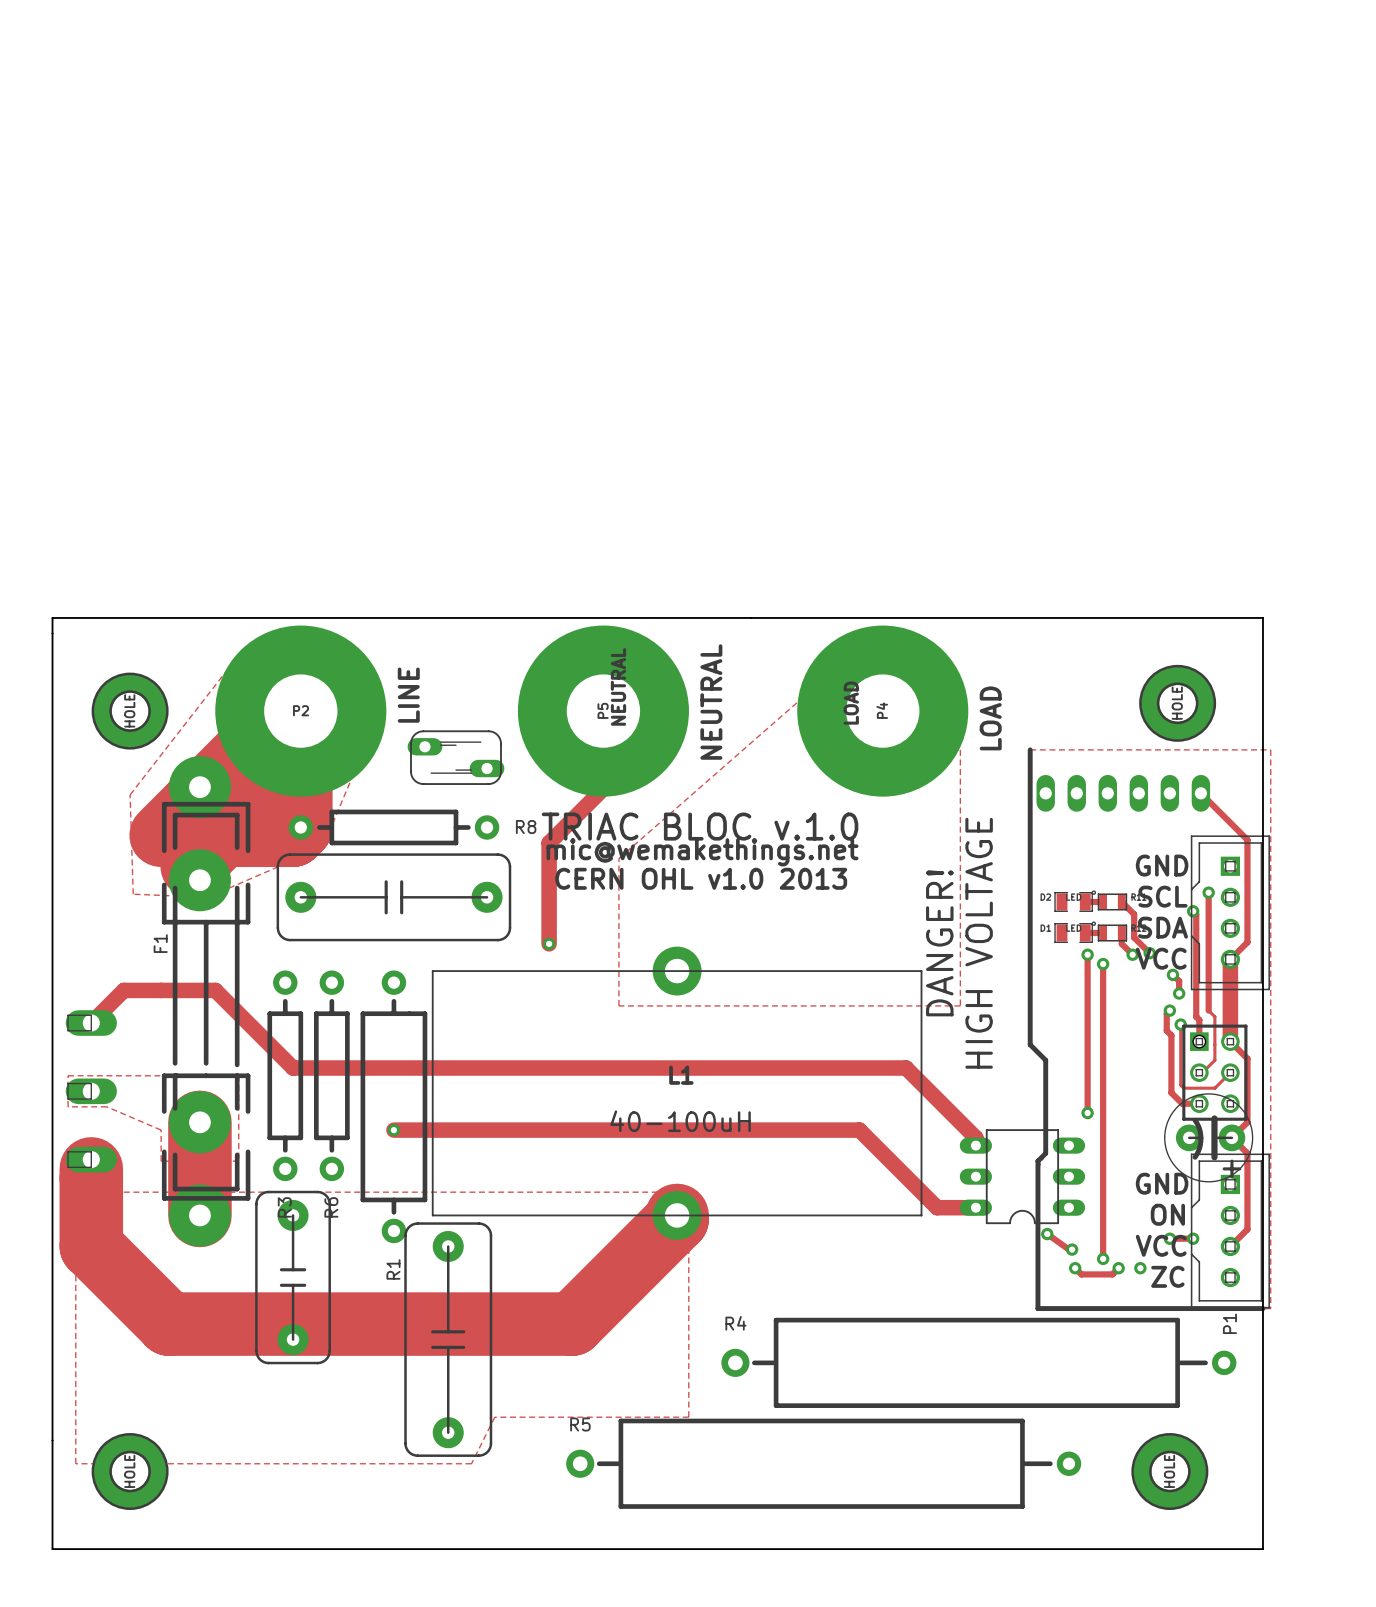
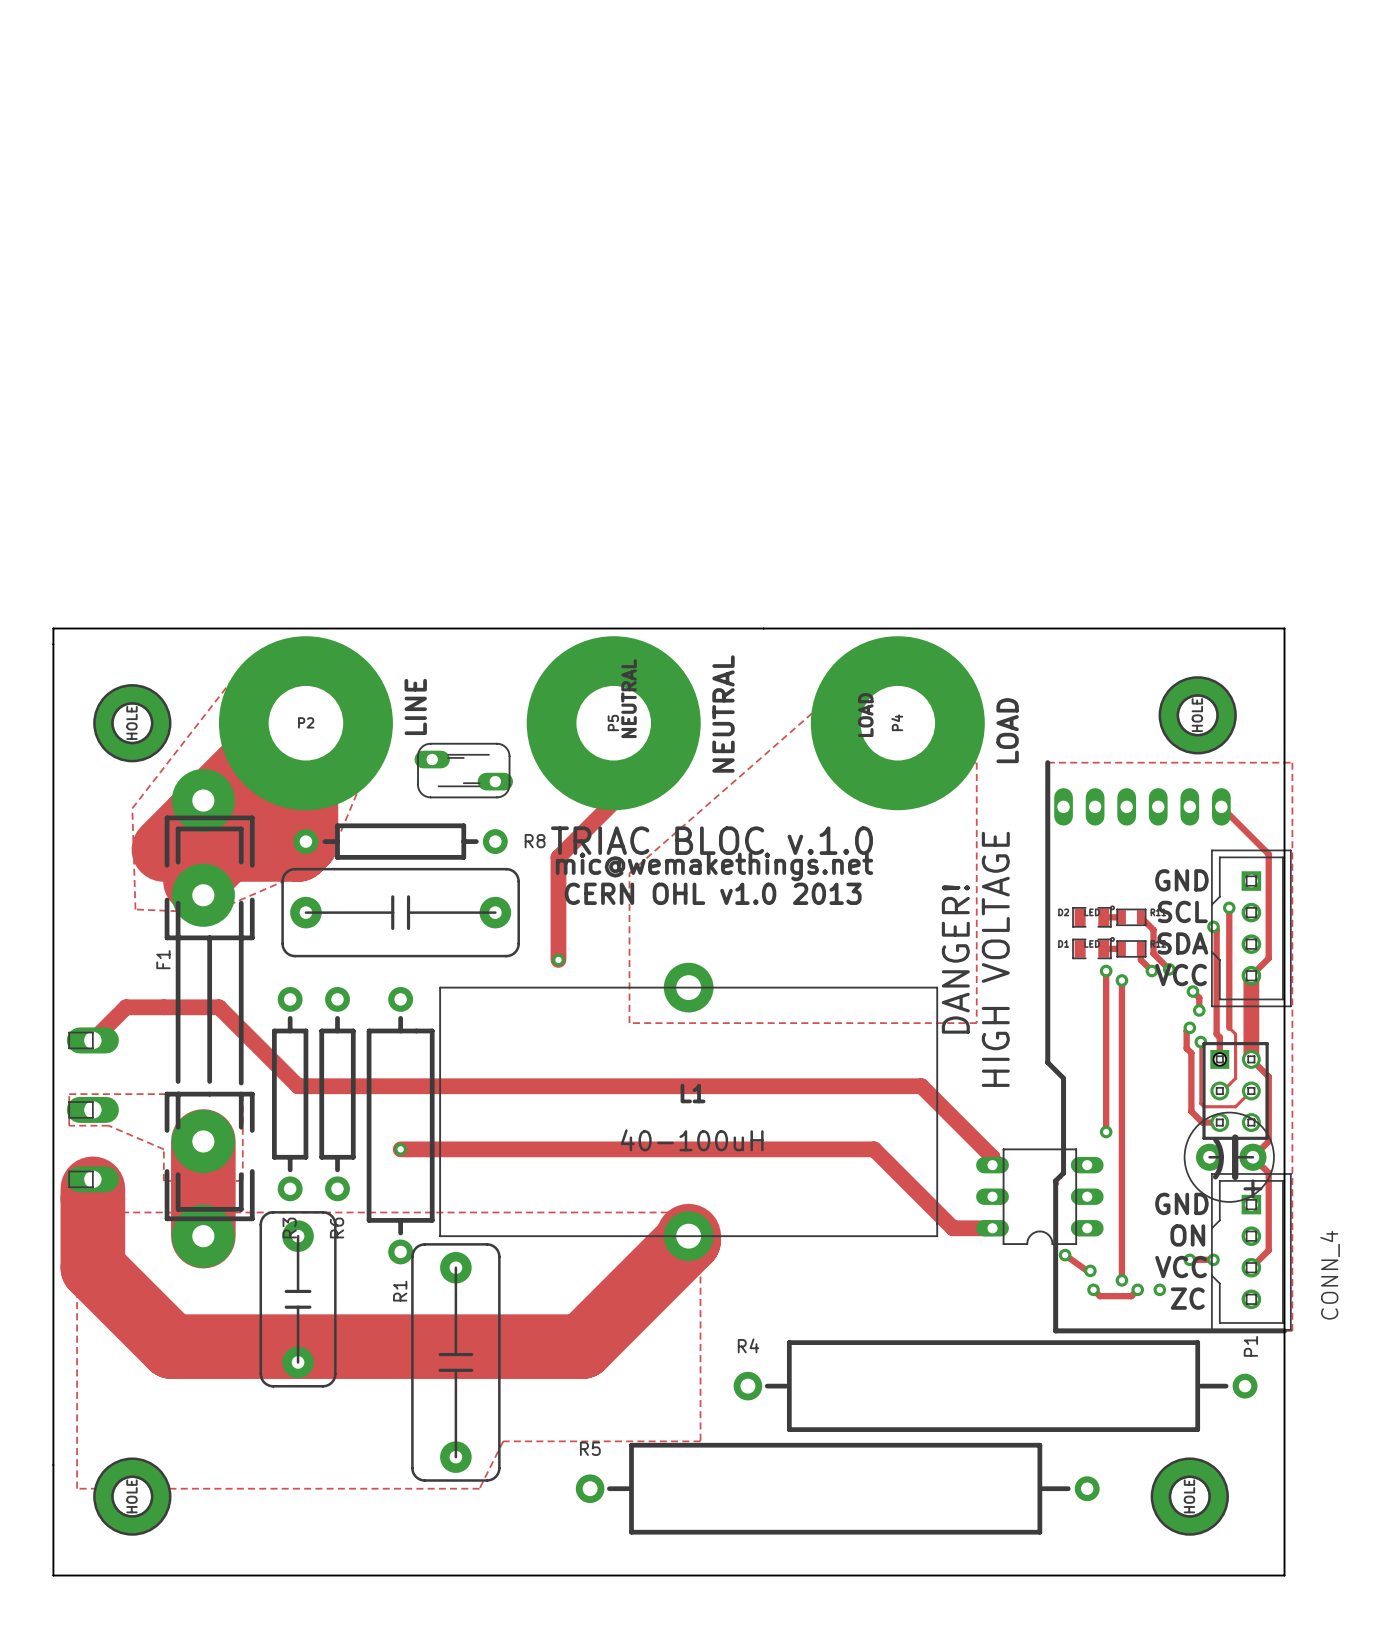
P1 value: none -> CONN_4 (1330, 1275)

